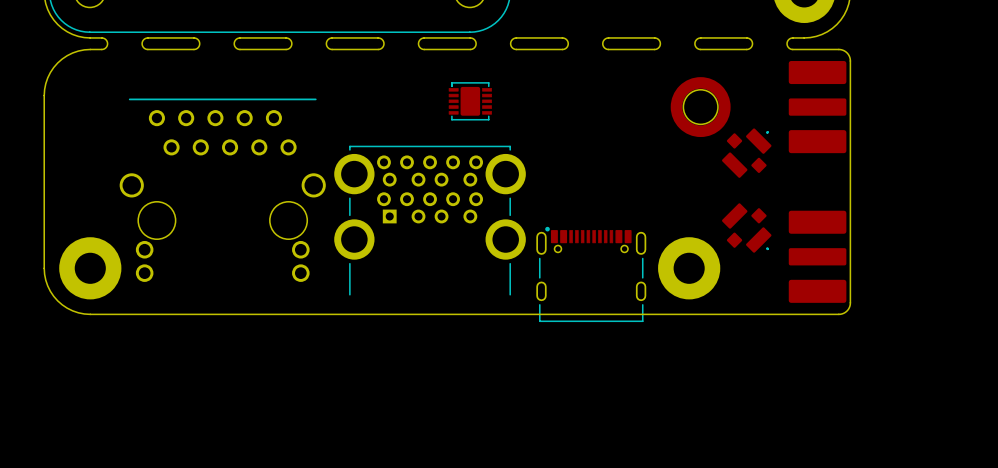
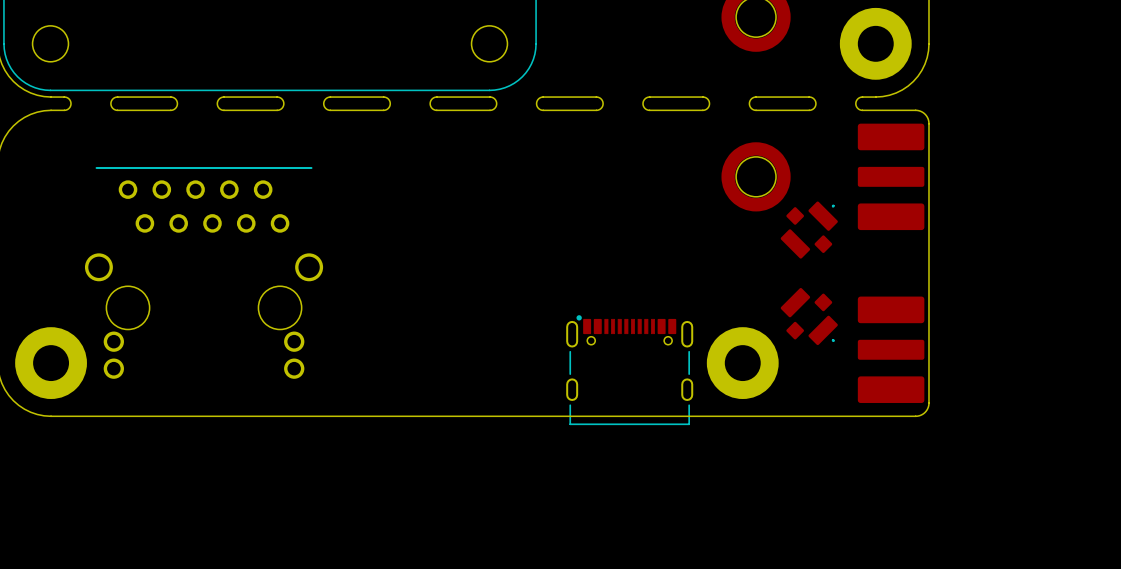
part: (467, 101) -> none
part: (430, 220) -> none

